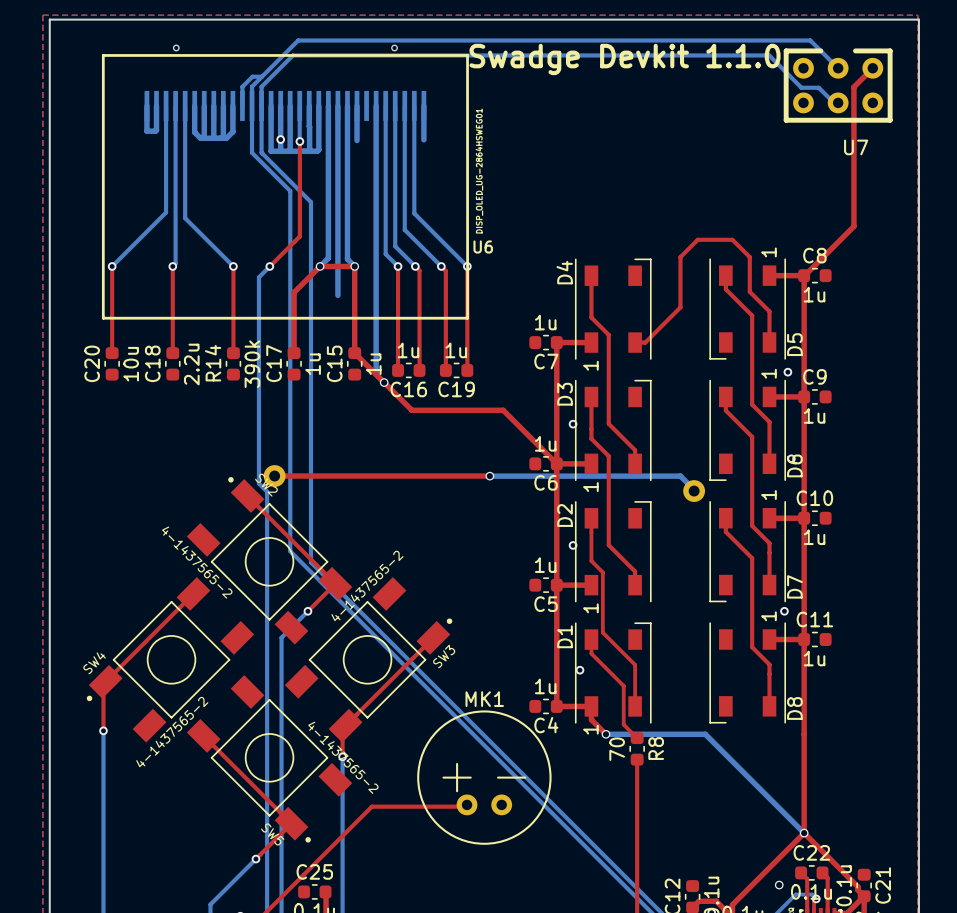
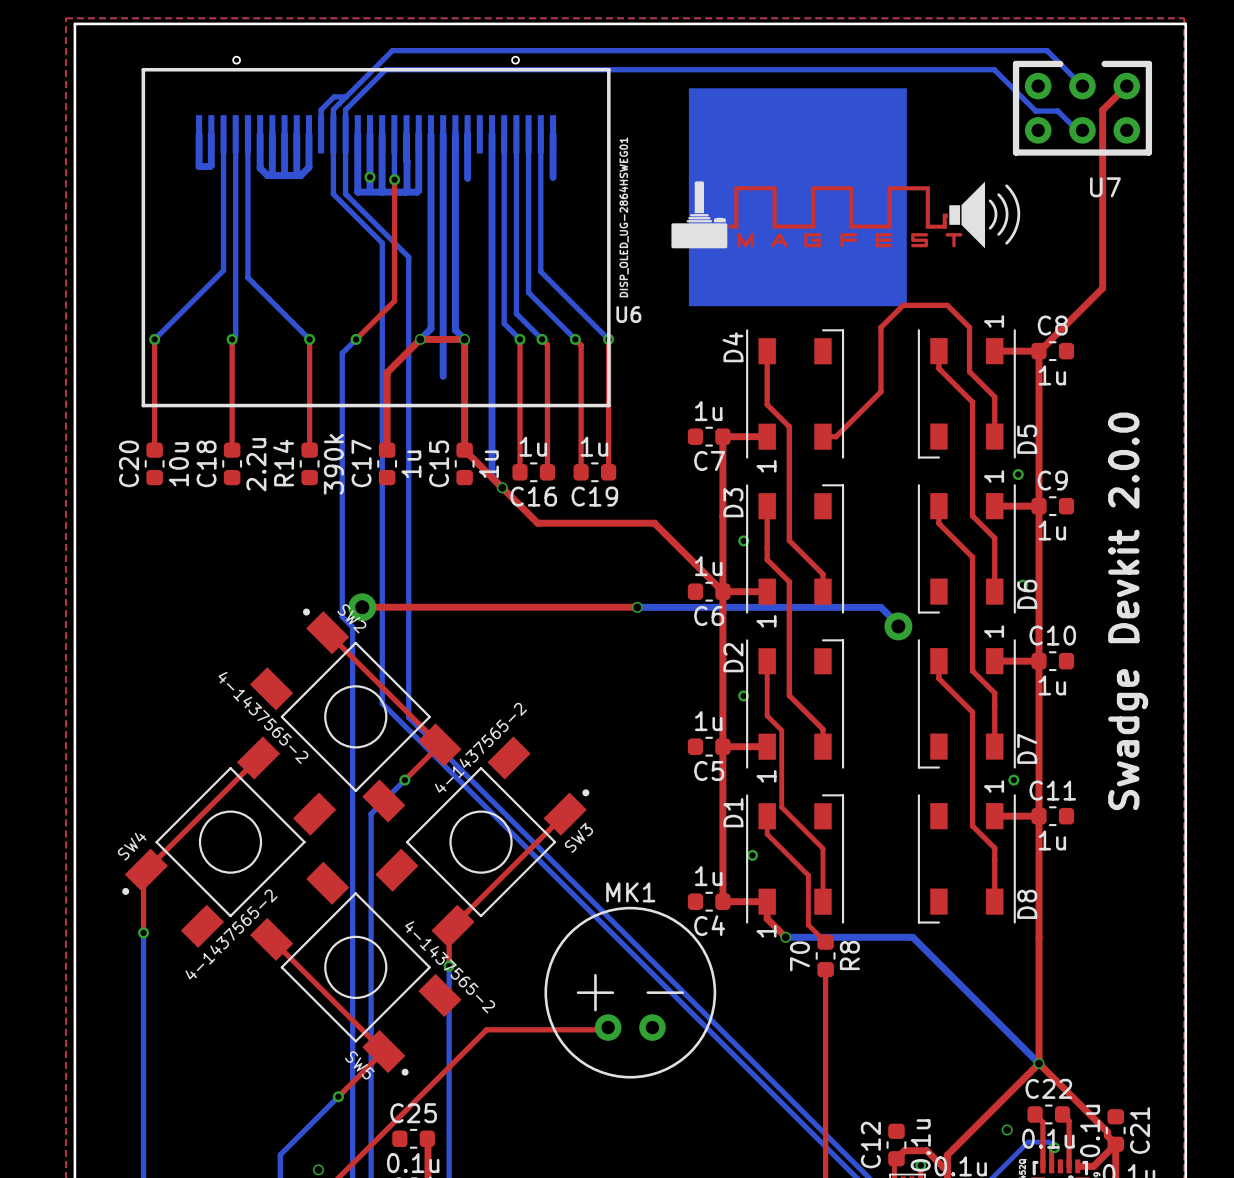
text: Swadge Devkit 1.1.0 (625, 59) -> none
drawing: none -> [671, 88, 1021, 307]
text: none -> Swadge Devkit 2.0.0 (1128, 611)

